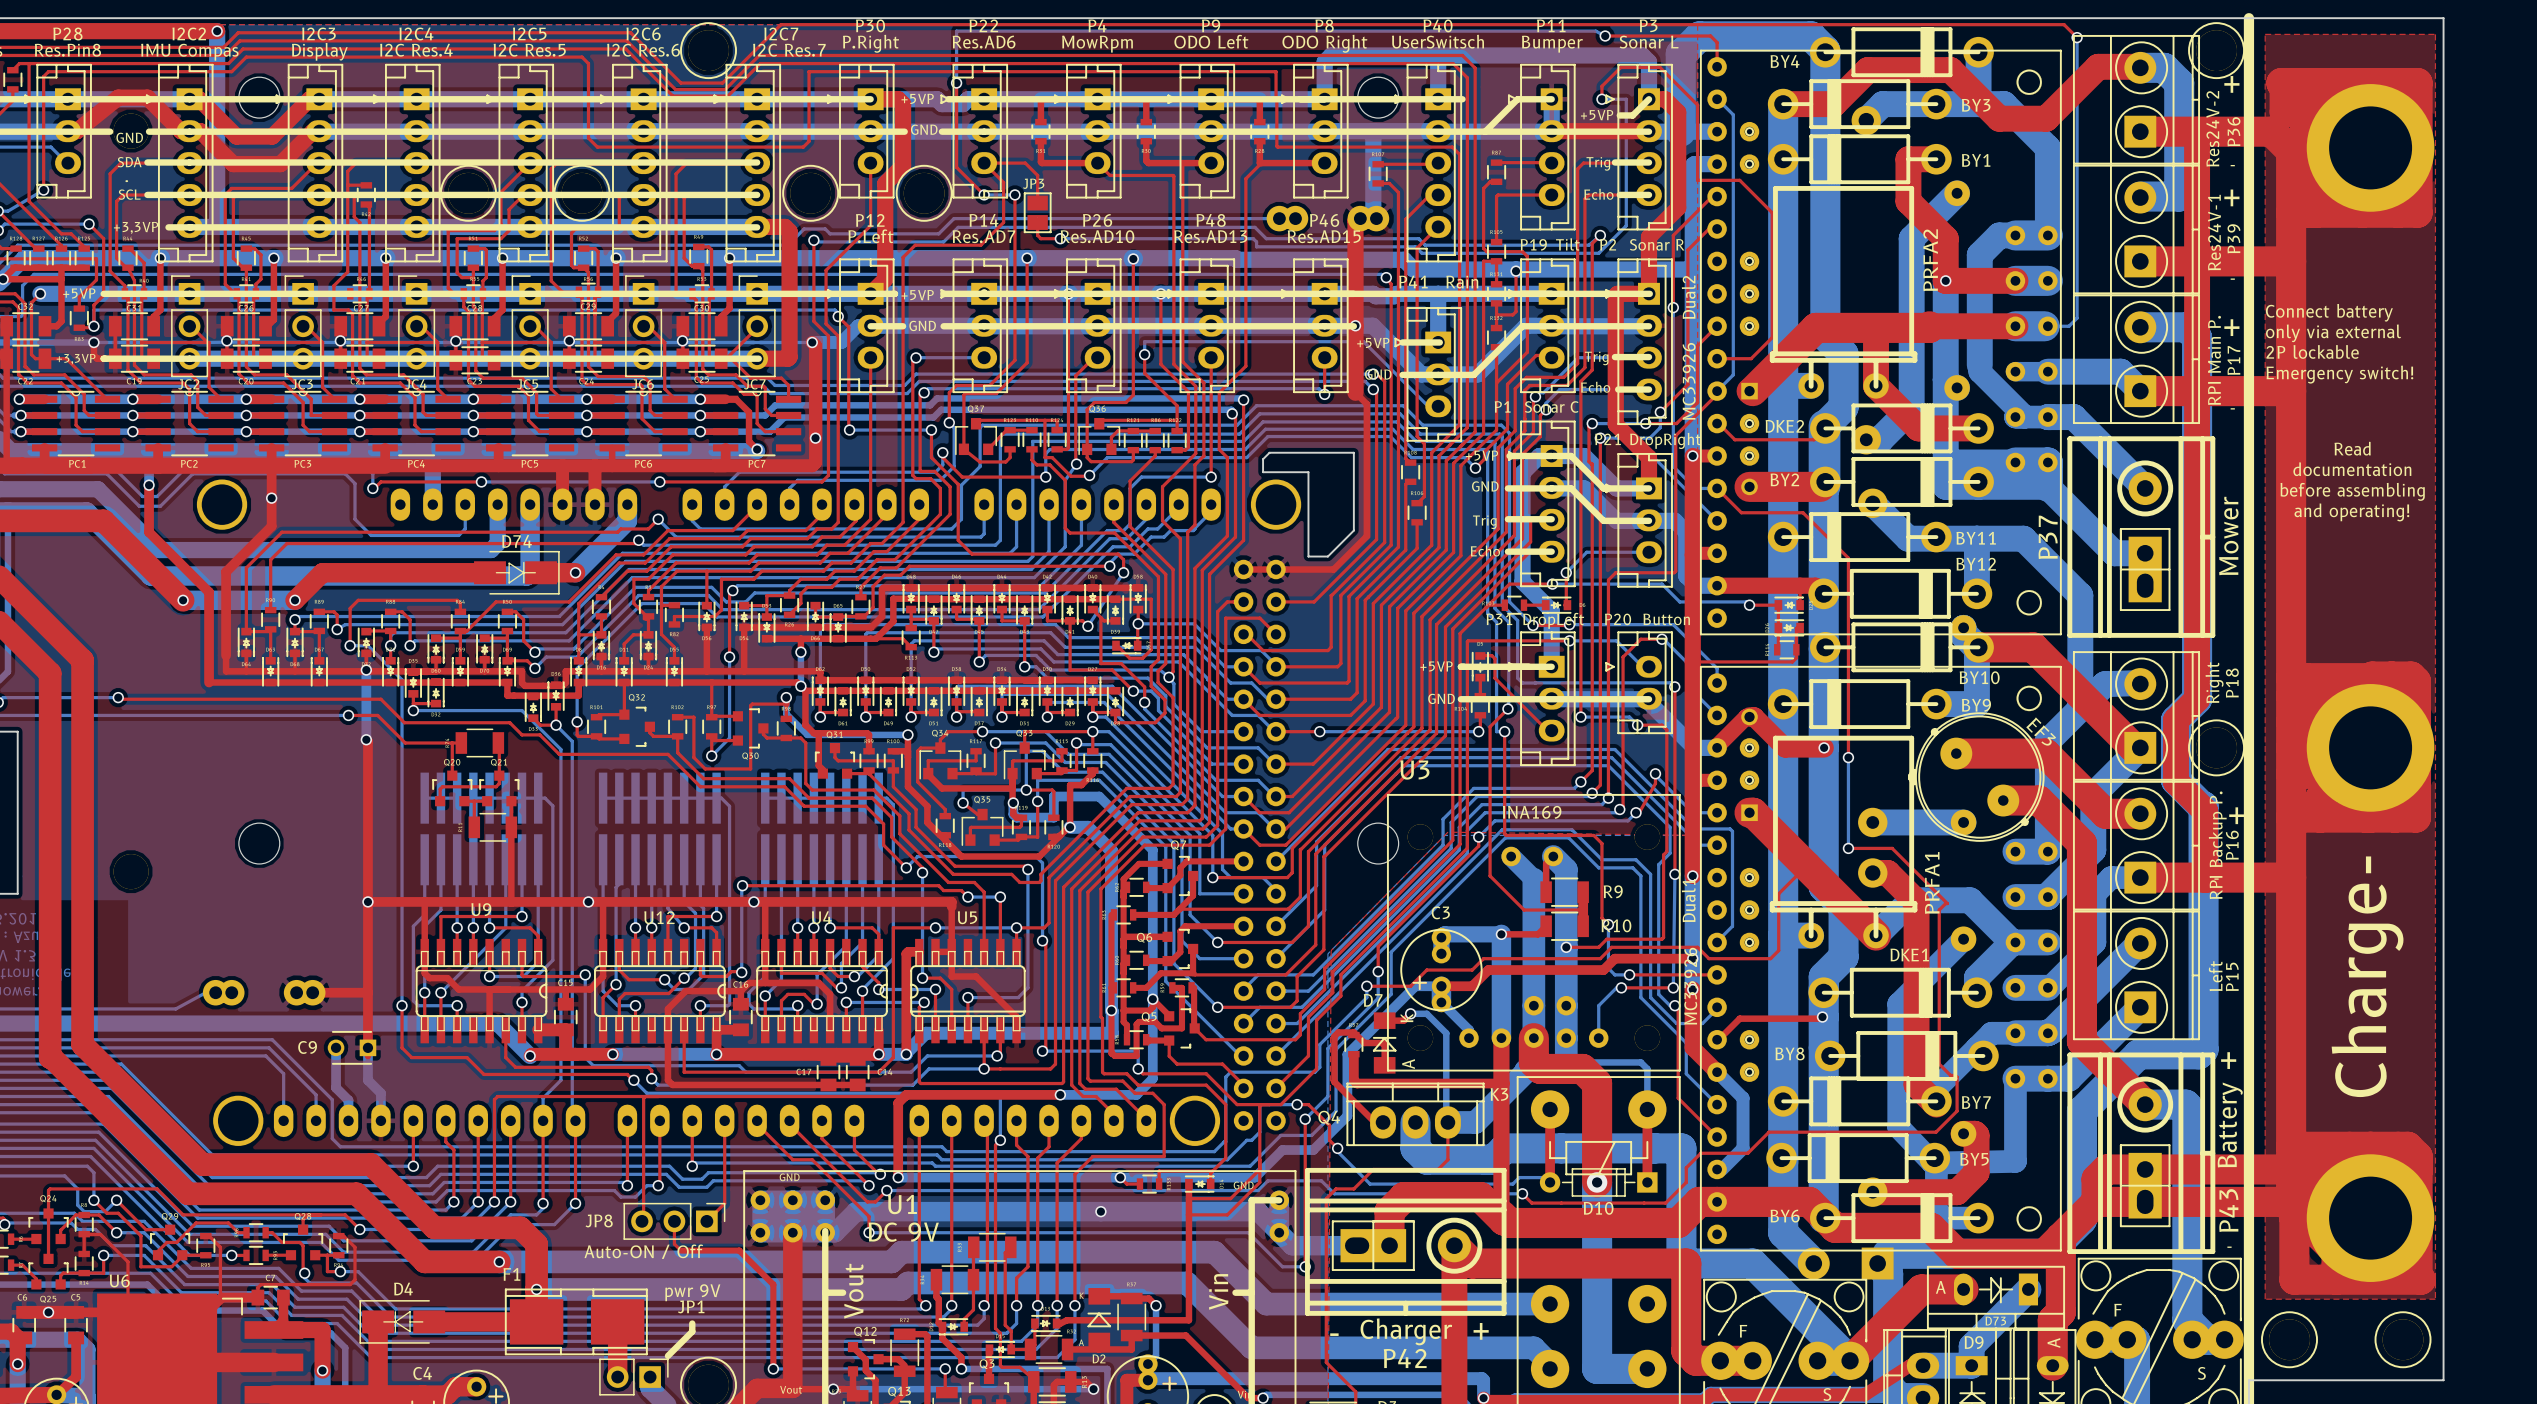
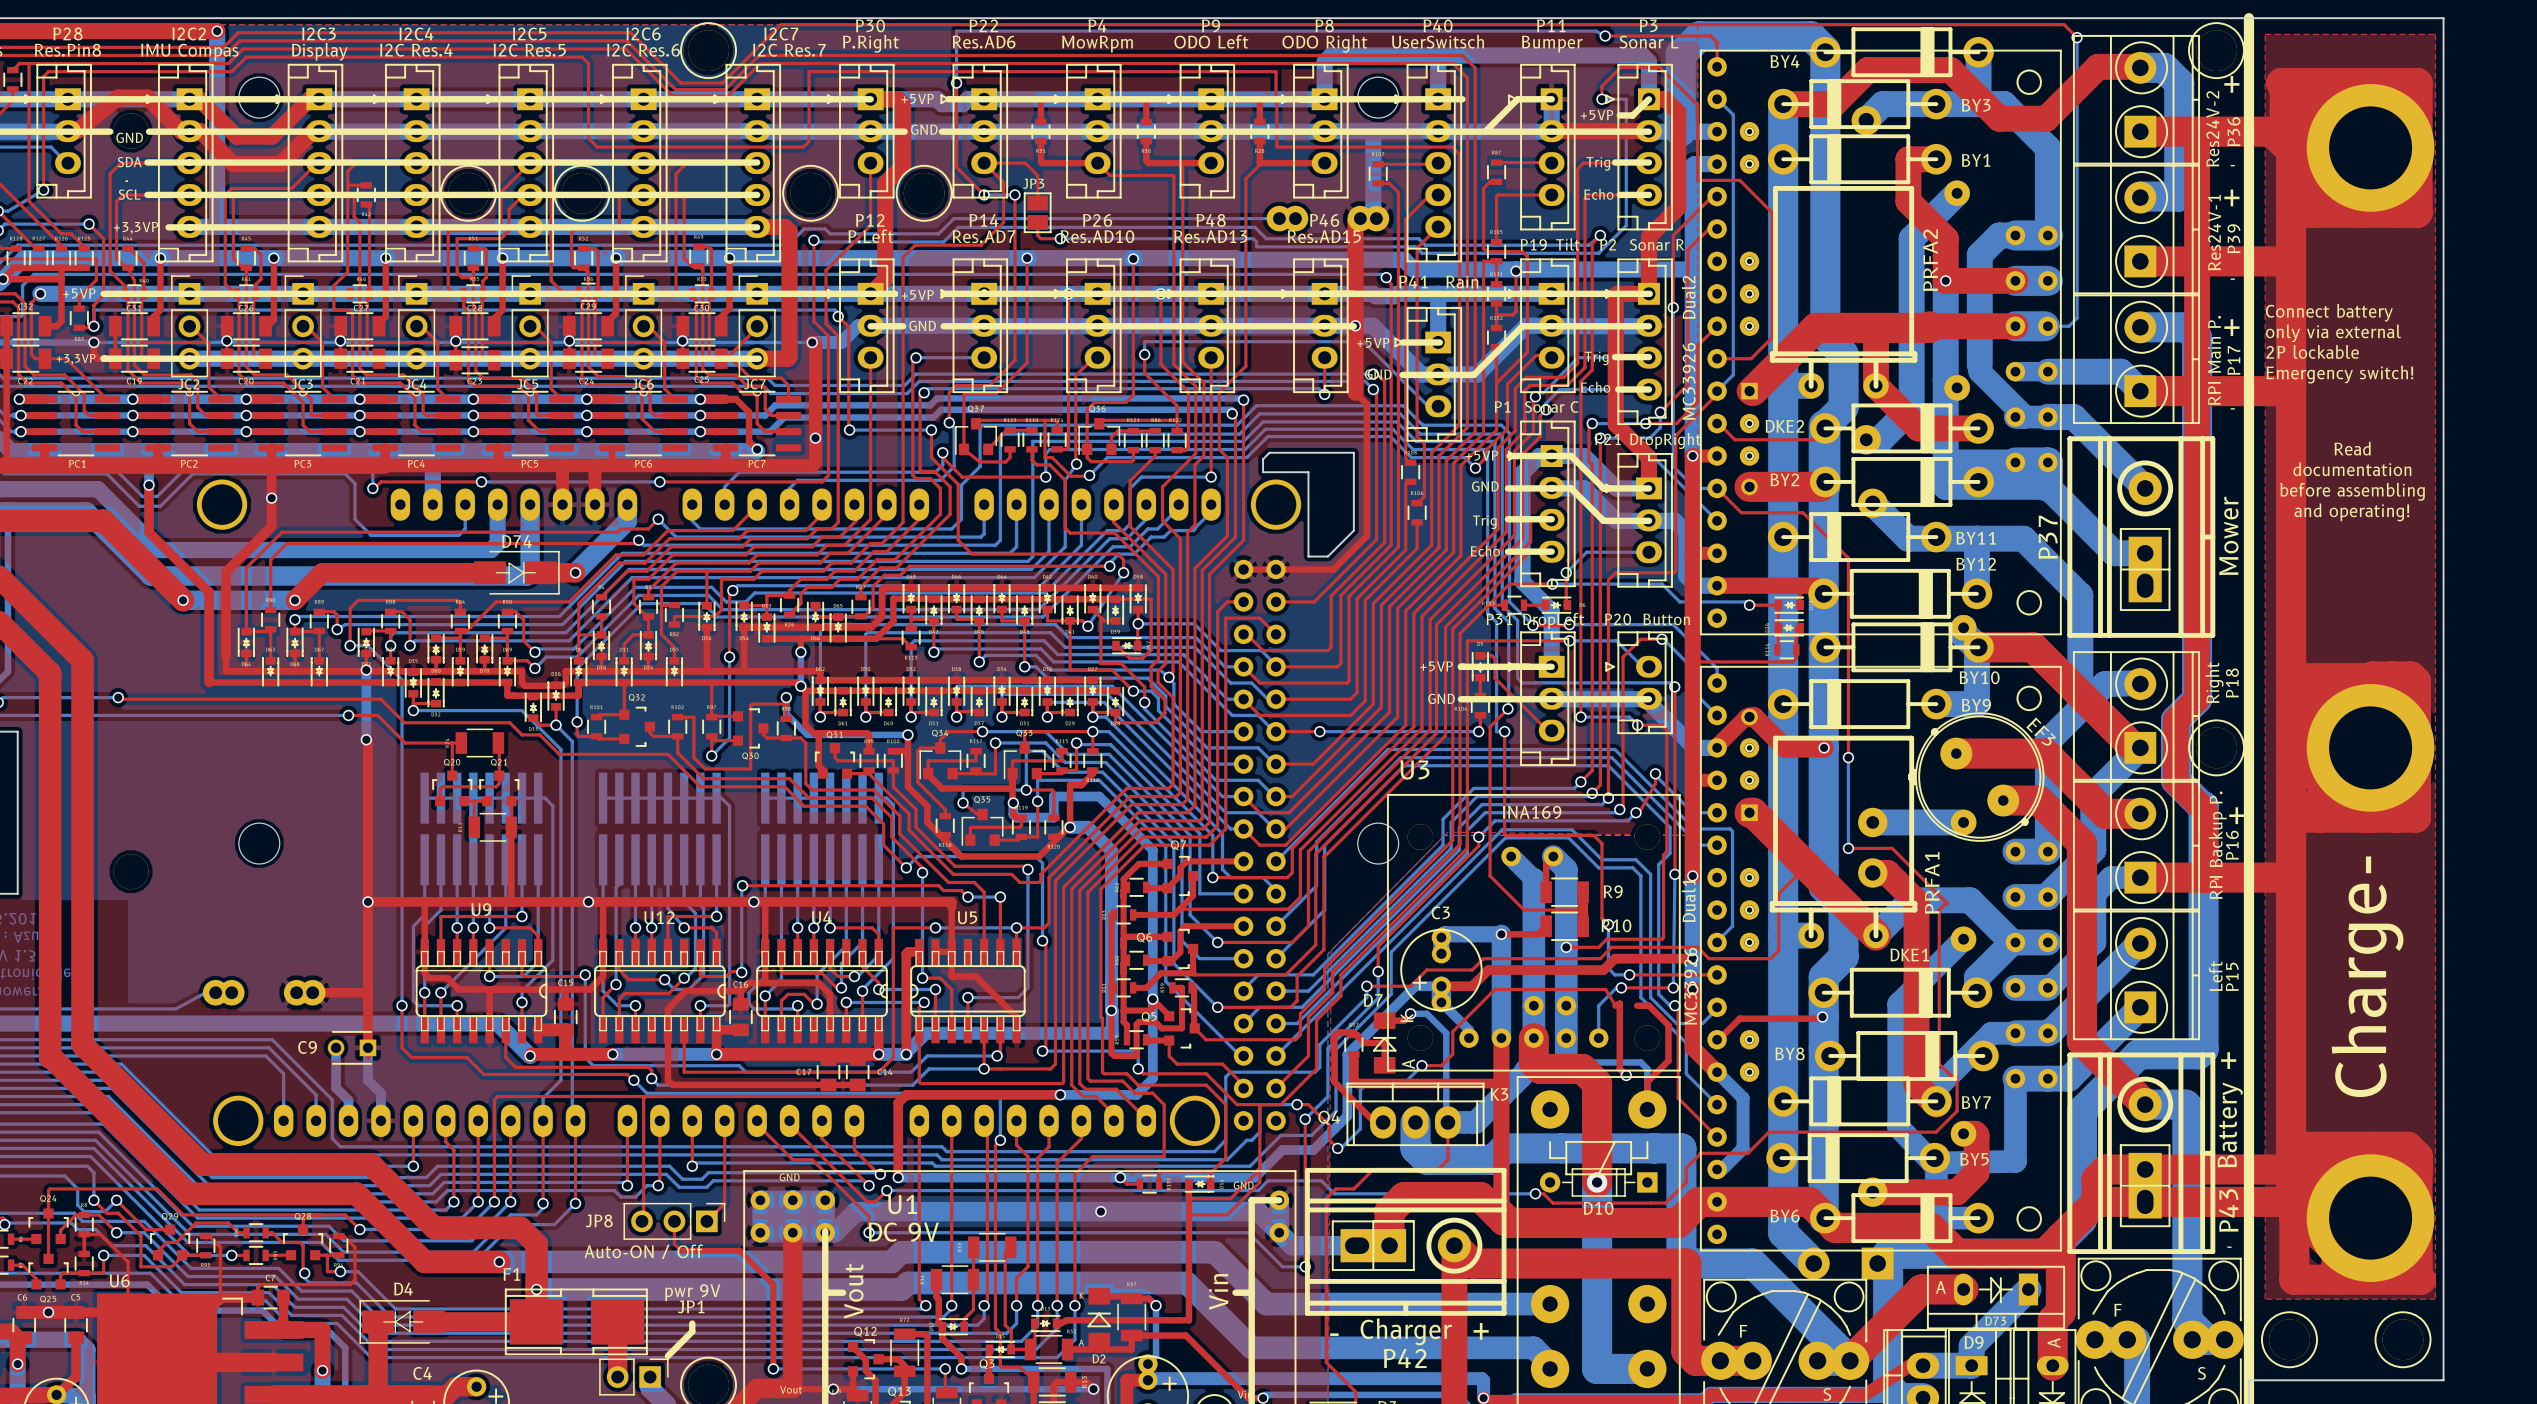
top track: none -> (1421, 1065) (1441, 1065) (1452, 1054) (1452, 1031) (1494, 989) (1605, 989) (1615, 1005) (1619, 1003) (1619, 1068) (1626, 1075)
via: none -> (1421, 1065)
via: none -> (1626, 1075)
top track: (1550, 1109) (1550, 1182) -> none
top track: (1647, 1109) (1647, 1182) -> (1647, 1109) (1647, 1081) (1668, 1060) (1668, 1025) (1648, 1005) (1637, 1005)
bottom track: (1337, 1148) (1337, 1151) (1370, 1184) (1512, 1184) (1519, 1177) (1545, 1177) (1550, 1182) -> (1337, 1148) (1340, 1148) (1360, 1128) (1360, 1090) (1365, 1085) (1402, 1085) (1421, 1065)
bottom track: none -> (1522, 1193) (1535, 1193)
top track: (1522, 1193) (1531, 1203) (1552, 1203) -> (1535, 1193) (1543, 1193) (1552, 1203)
via position: (1522, 1193) -> (1535, 1193)

